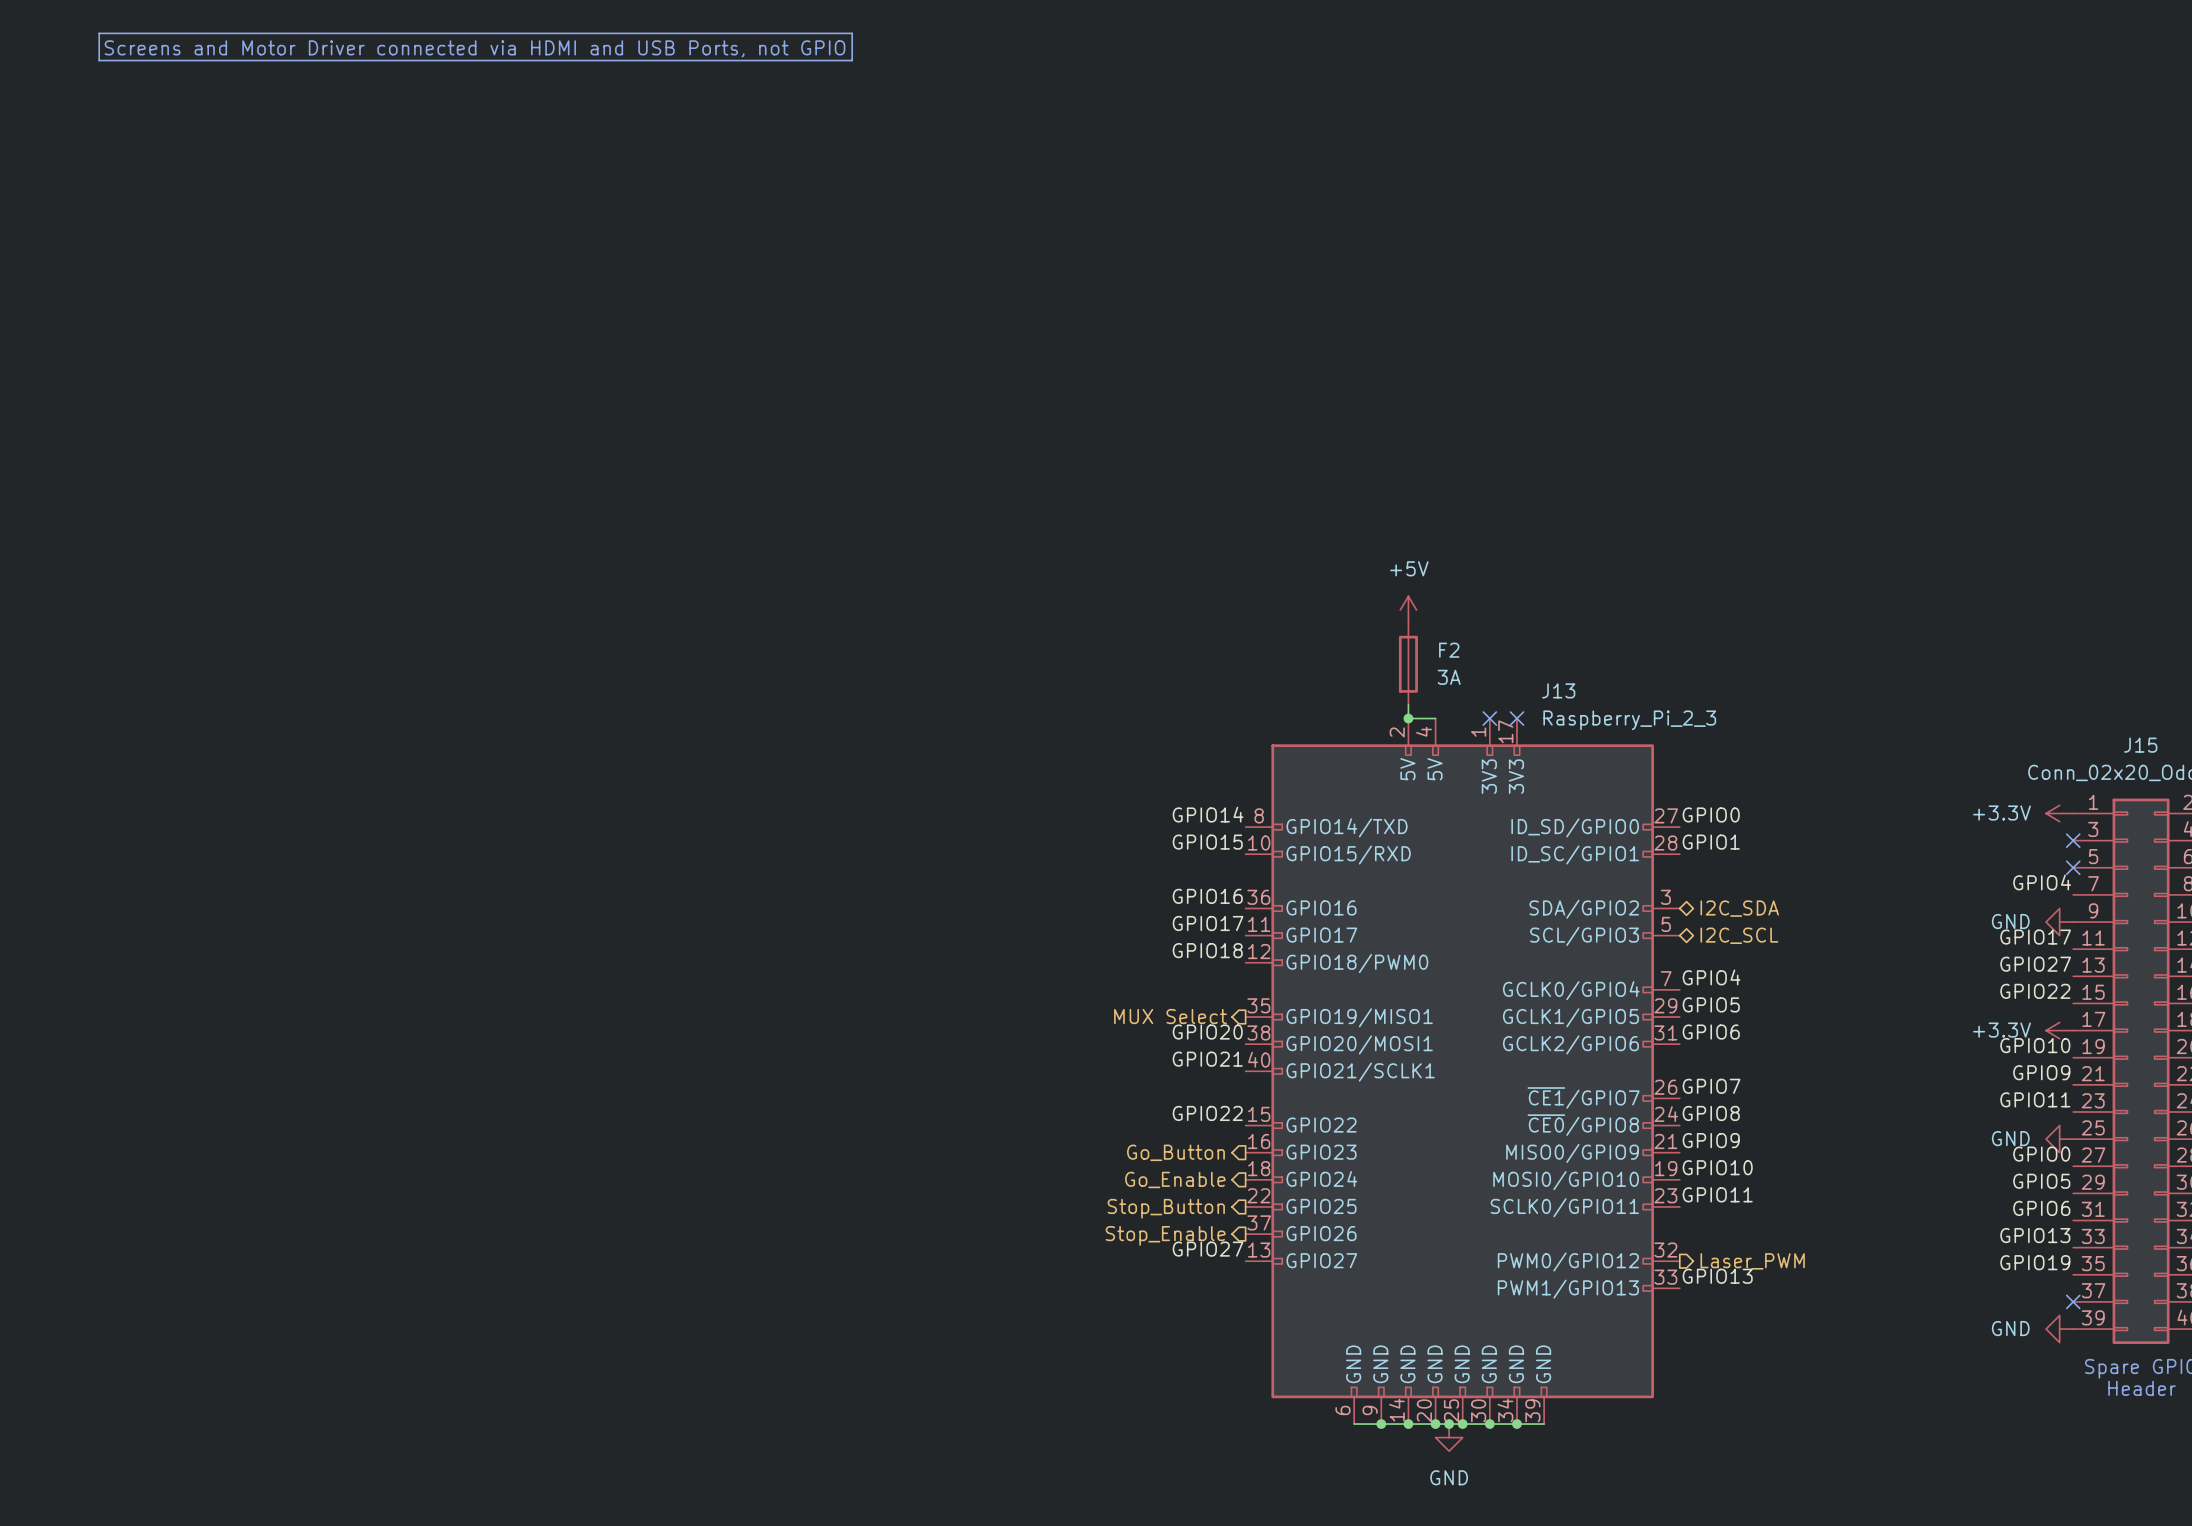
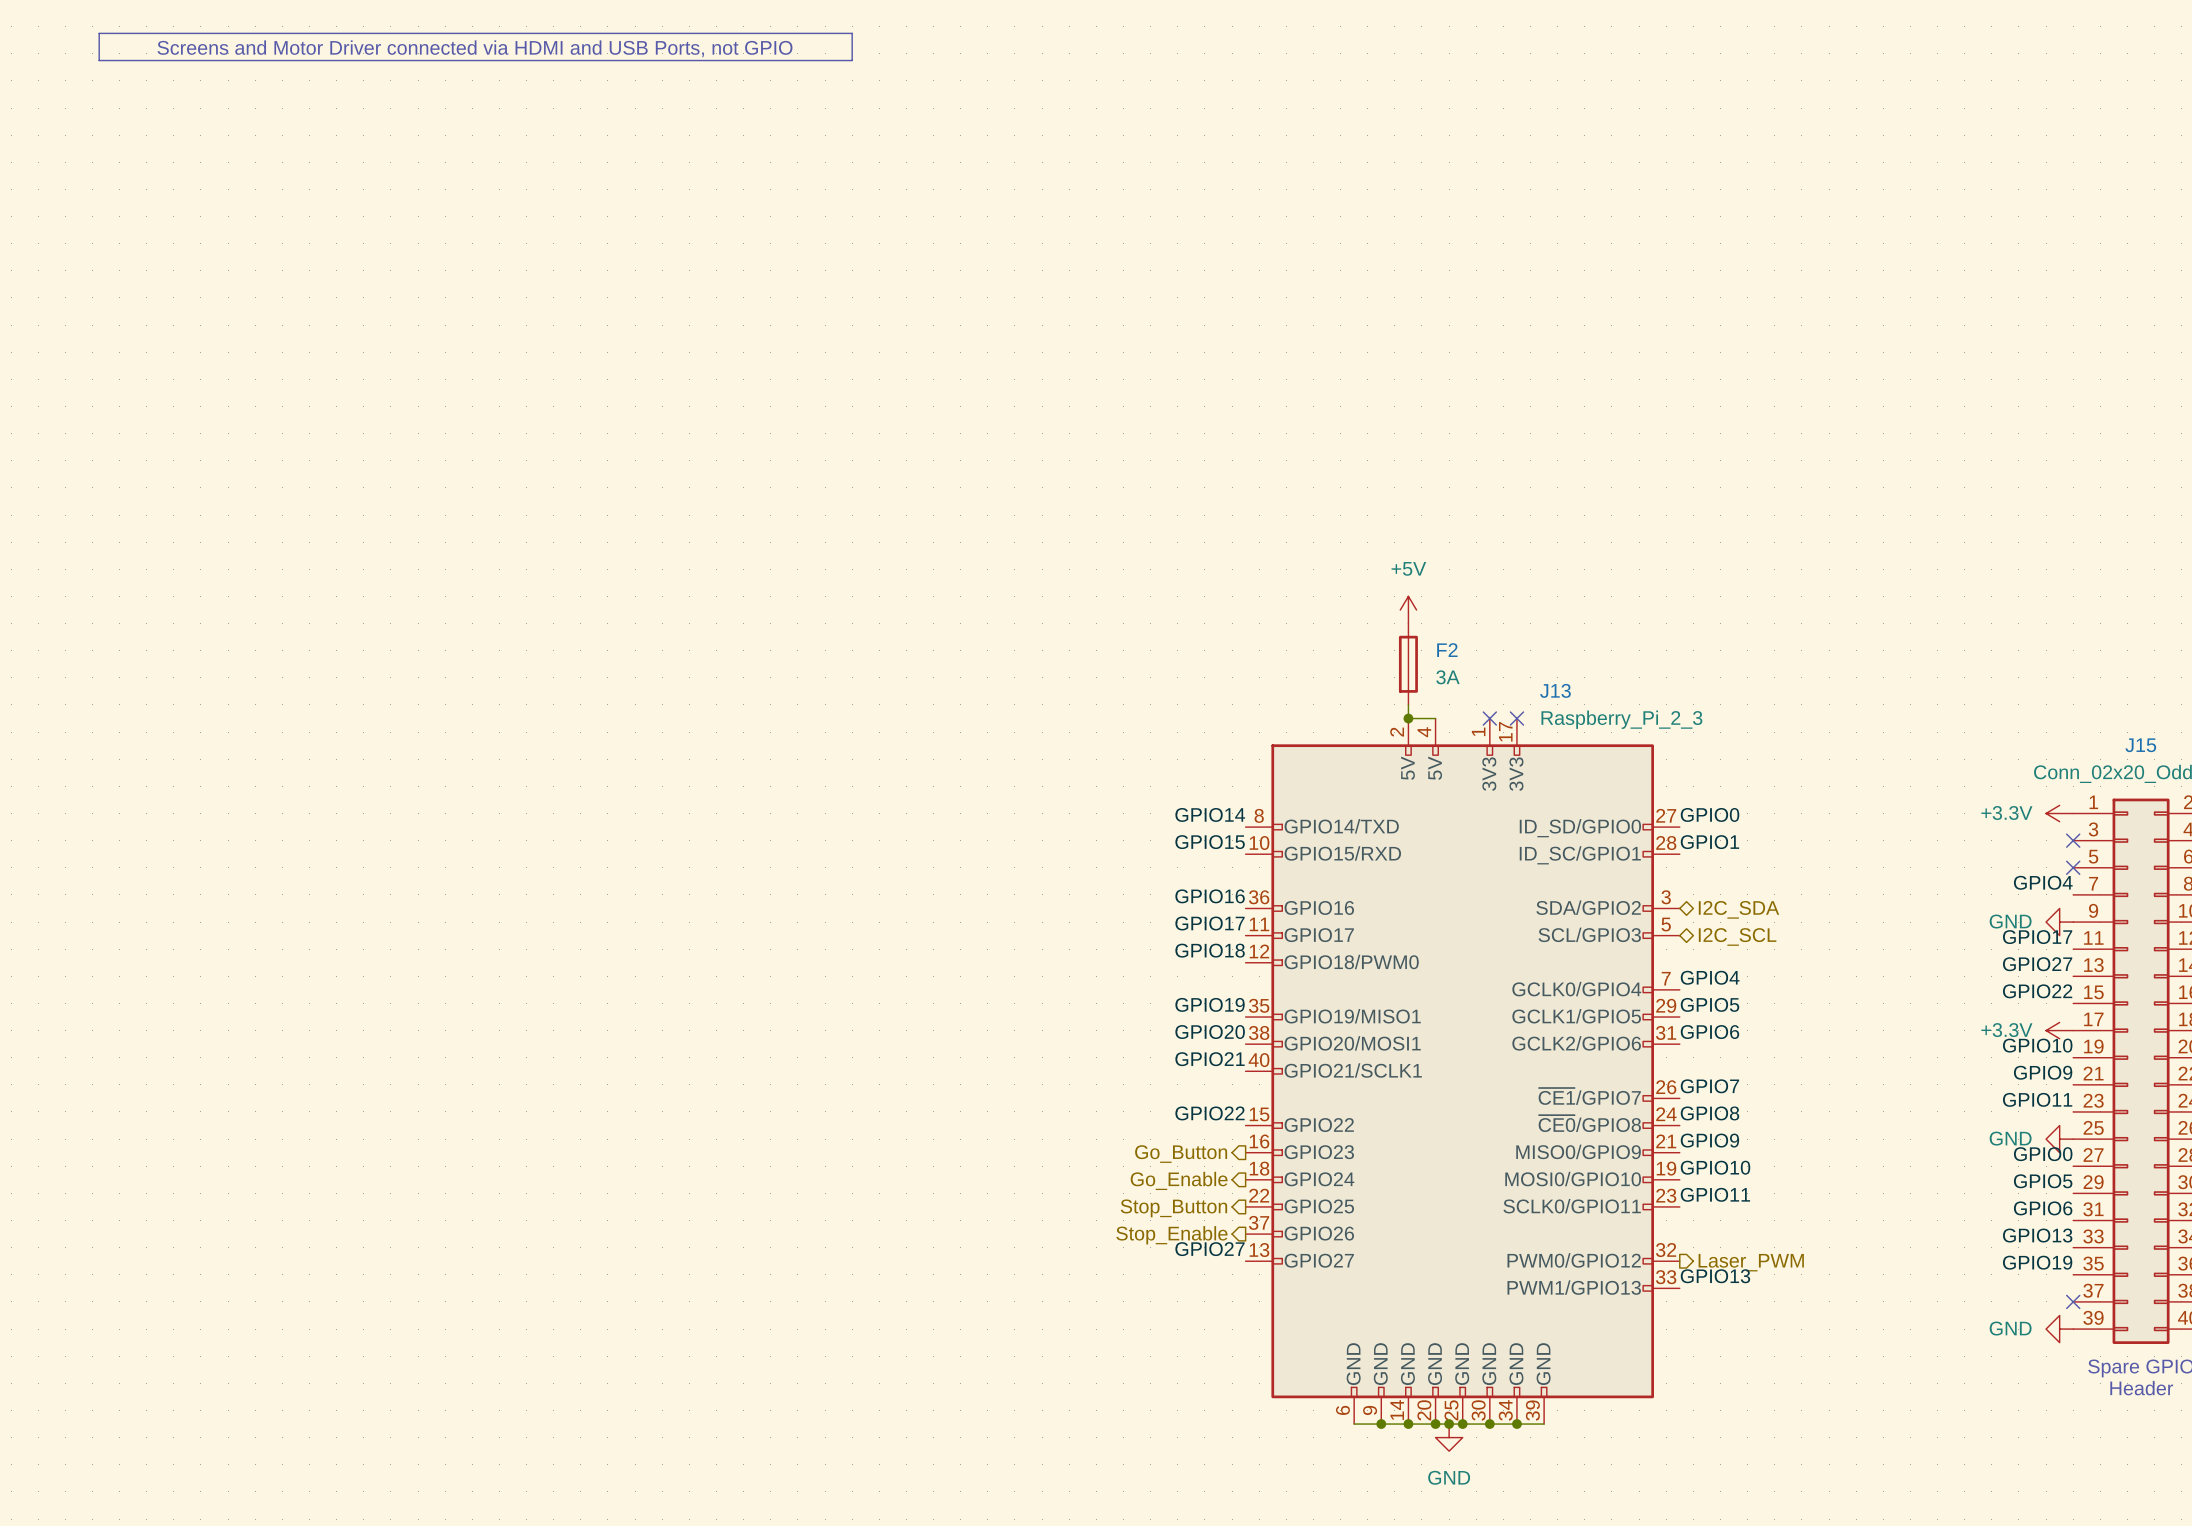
label: none -> GPIO19 (1210, 1004)
hierarchical label: MUX Select (1170, 1016) -> none

